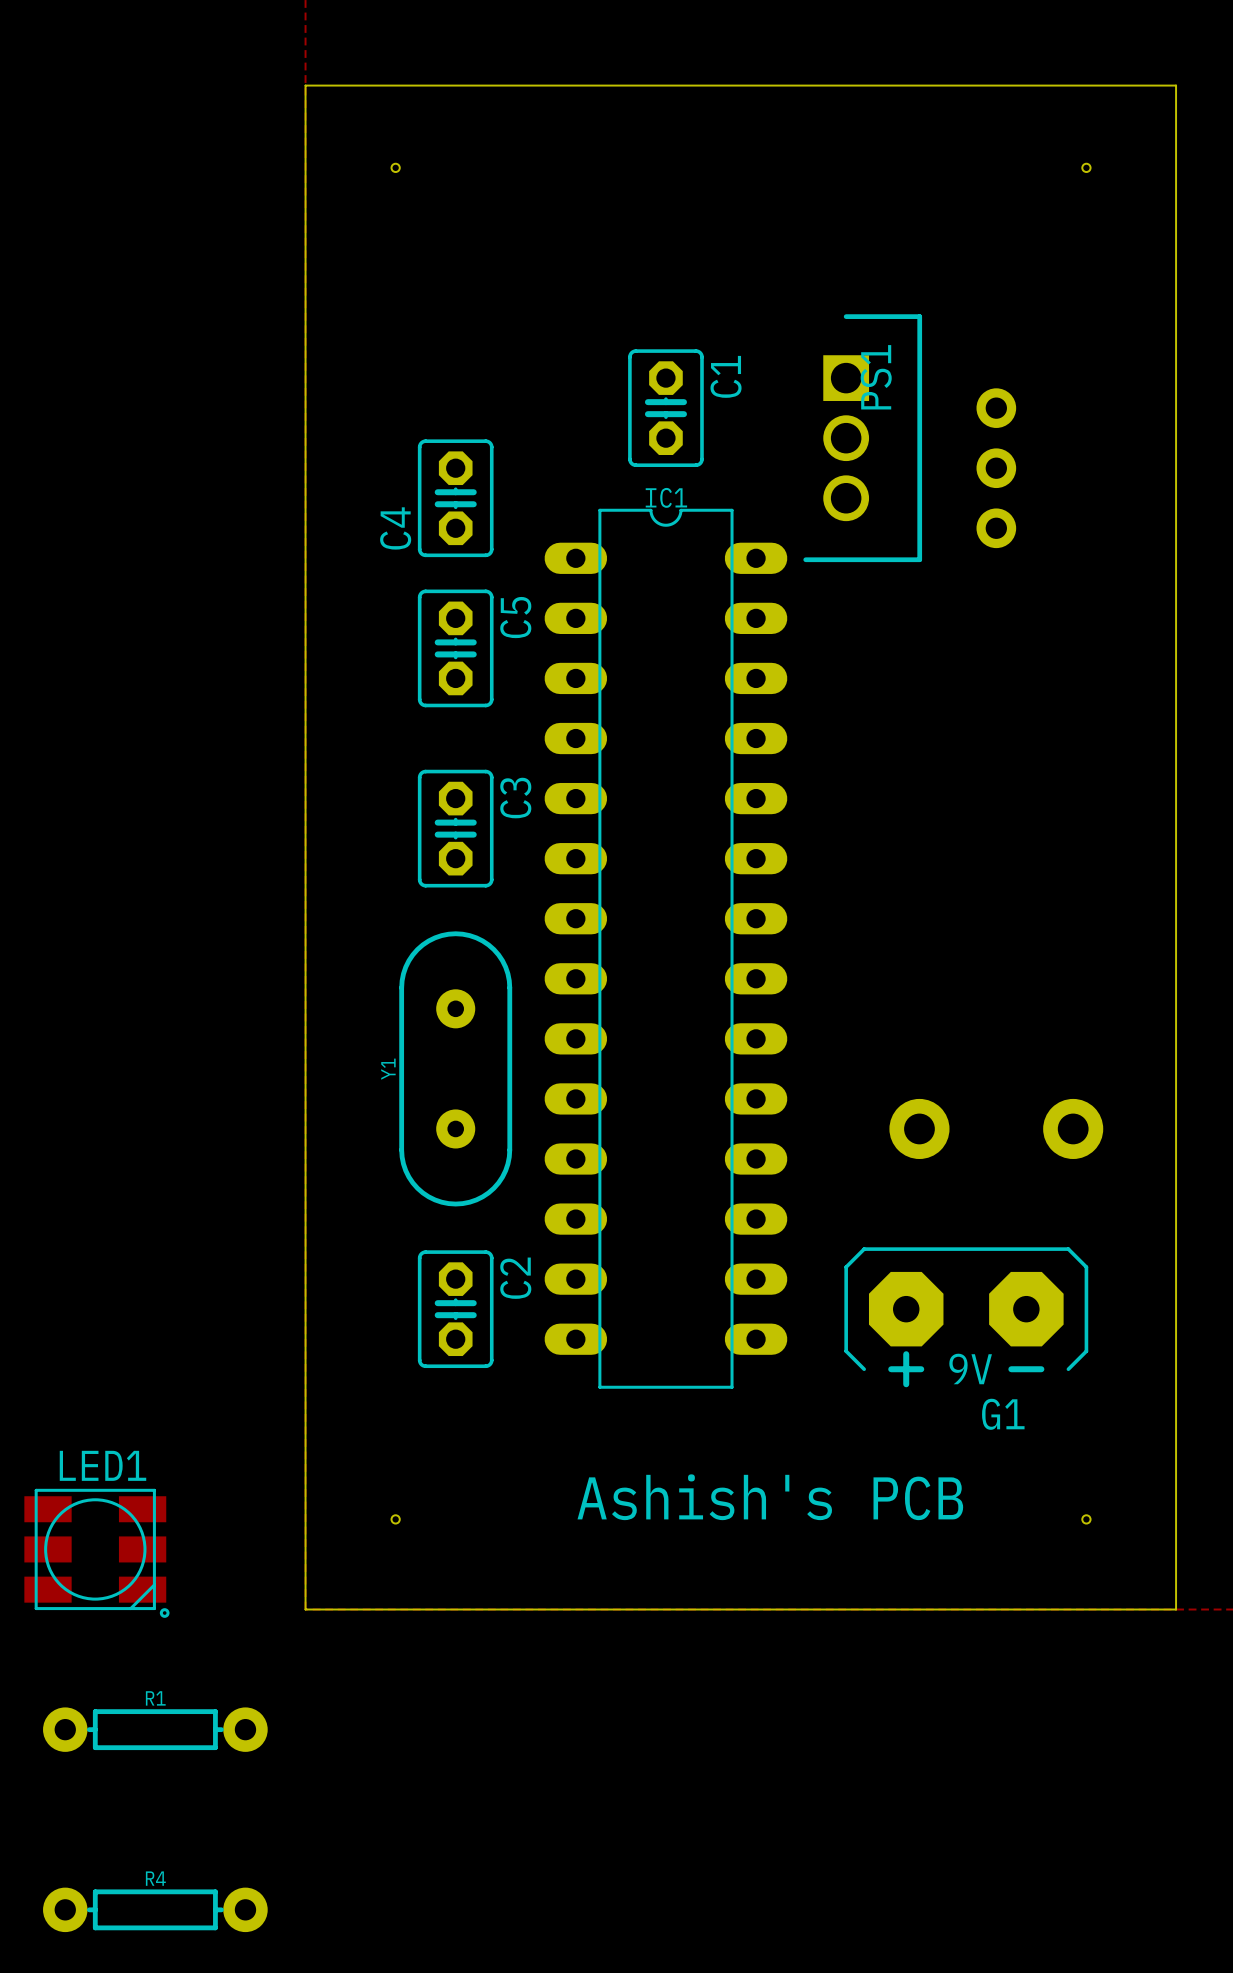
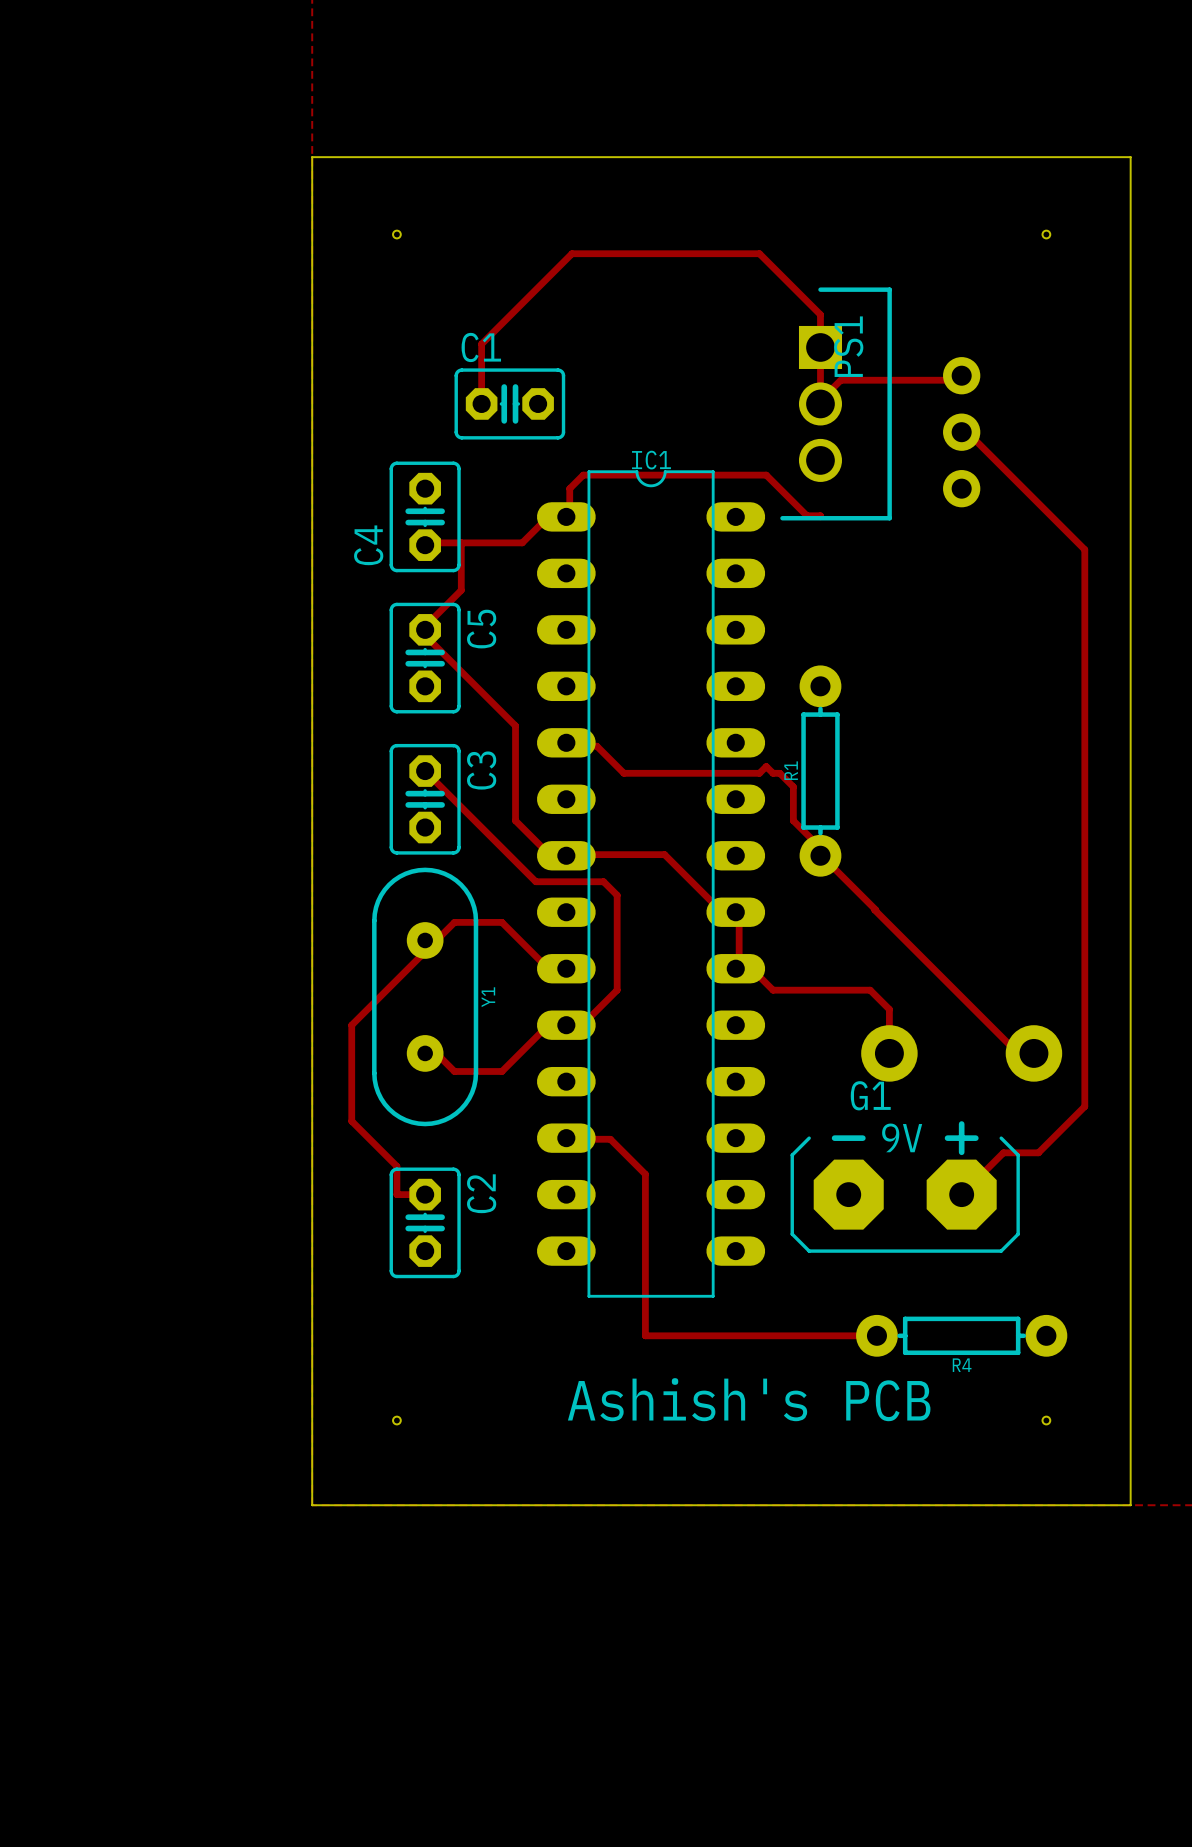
hole position: (395, 167) -> (396, 234)
hole position: (1086, 167) -> (1046, 234)
board edge: (305, 175) (305, 85) (1176, 85) (1176, 175) -> (312, 157) (1130, 157)
C1 name position: C1 (726, 376) -> C1 (481, 347)
C1 rotation: 0° (665, 408) -> 90° clockwise (509, 403)
C1 position: (665, 408) -> (509, 403)
track: none -> (961, 375) (956, 380) (840, 380) (820, 400)
track: none -> (481, 403) (481, 344) (571, 253) (759, 253) (820, 314) (820, 403)
track: none -> (961, 432) (962, 434) (969, 434) (1084, 549) (1084, 1106) (1038, 1152) (1003, 1152) (961, 1194)
C4 position: (455, 498) -> (425, 516)
track: none -> (820, 516) (806, 515) (766, 475) (583, 475) (569, 488) (569, 515) (566, 516) (562, 522) (542, 522) (522, 542) (427, 542) (425, 545)
track: none -> (461, 542) (461, 590) (427, 624) (425, 629) (427, 630) (427, 637) (515, 725) (515, 820) (549, 854) (664, 854) (718, 908) (732, 908) (739, 915) (739, 963) (735, 968) (739, 956) (773, 990) (870, 990) (889, 1009) (889, 1053)
C5 position: (455, 648) -> (425, 658)
track: none -> (566, 742) (569, 746) (596, 746) (623, 773) (759, 773) (766, 766) (773, 773) (779, 773) (793, 786) (793, 820) (820, 847) (820, 855)
track: none -> (425, 771) (535, 881) (603, 881) (617, 895) (617, 990) (583, 1024) (566, 1025) (562, 1030) (542, 1030) (501, 1071) (454, 1071) (440, 1057) (427, 1057) (425, 1053)
C3 position: (455, 828) -> (425, 799)
track: none -> (820, 854) (1018, 1053) (1033, 1053)
track: none -> (566, 968) (562, 963) (542, 963) (501, 922) (454, 922) (440, 935) (427, 935) (425, 940) (420, 942) (420, 956) (351, 1025) (351, 1121) (396, 1166) (396, 1194) (425, 1194)
Y1 position: (455, 1068) -> (425, 996)
Y1 name position: Y1 (388, 1069) -> Y1 (488, 997)
track: none -> (566, 1138) (610, 1139) (645, 1174) (645, 1335) (876, 1335)
G1 footprint: [844, 1247, 1089, 1388] -> [790, 1121, 1020, 1253]
C2 position: (455, 1309) -> (425, 1222)
G1 name position: G1 (1003, 1414) -> G1 (870, 1095)
LED1: (96, 1553) -> none
R1 rotation: 0° (155, 1729) -> 90° clockwise (820, 771)
R1 position: (155, 1729) -> (820, 771)
R4 name position: R4 (155, 1878) -> R4 (962, 1365)
R4 position: (155, 1909) -> (961, 1335)

